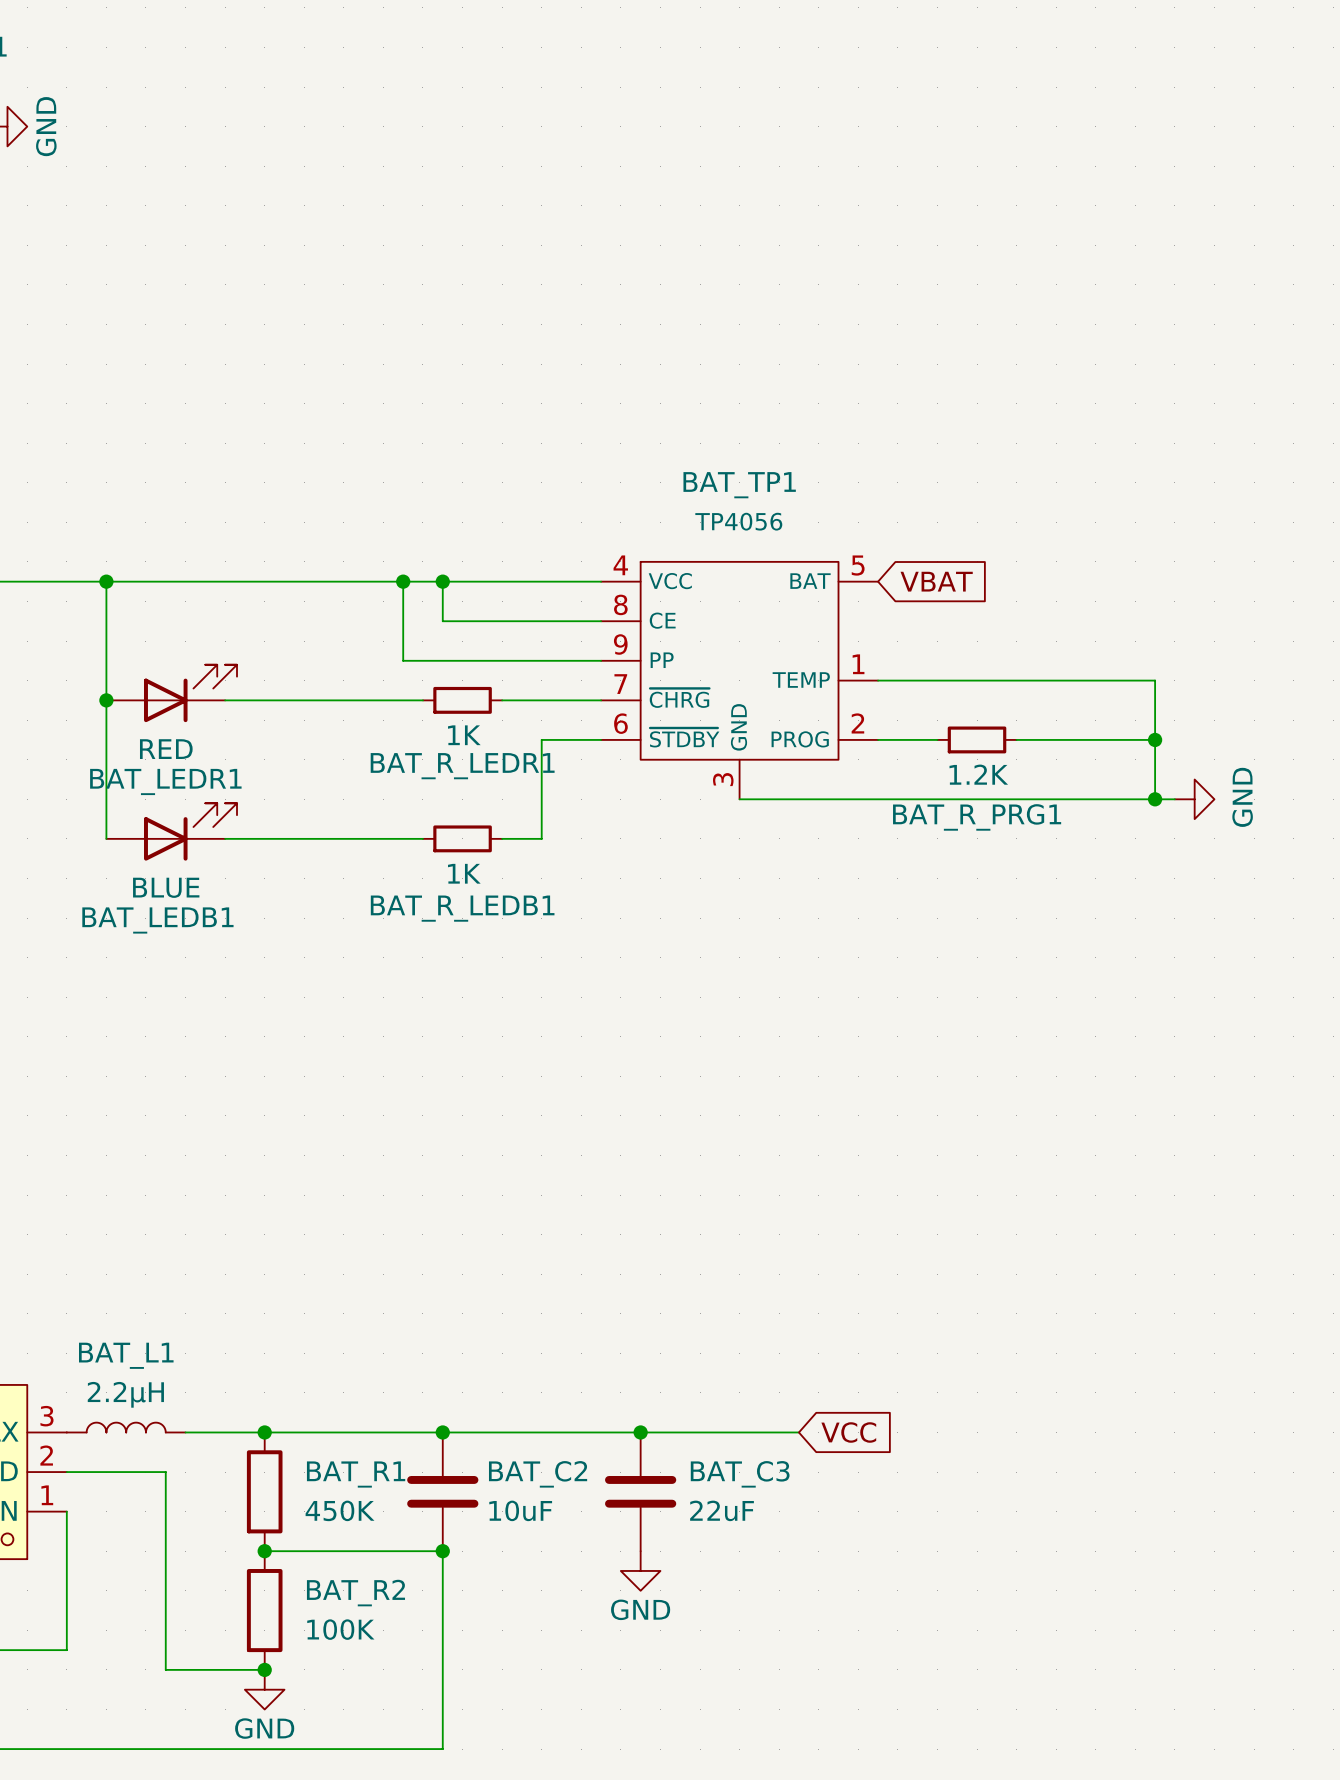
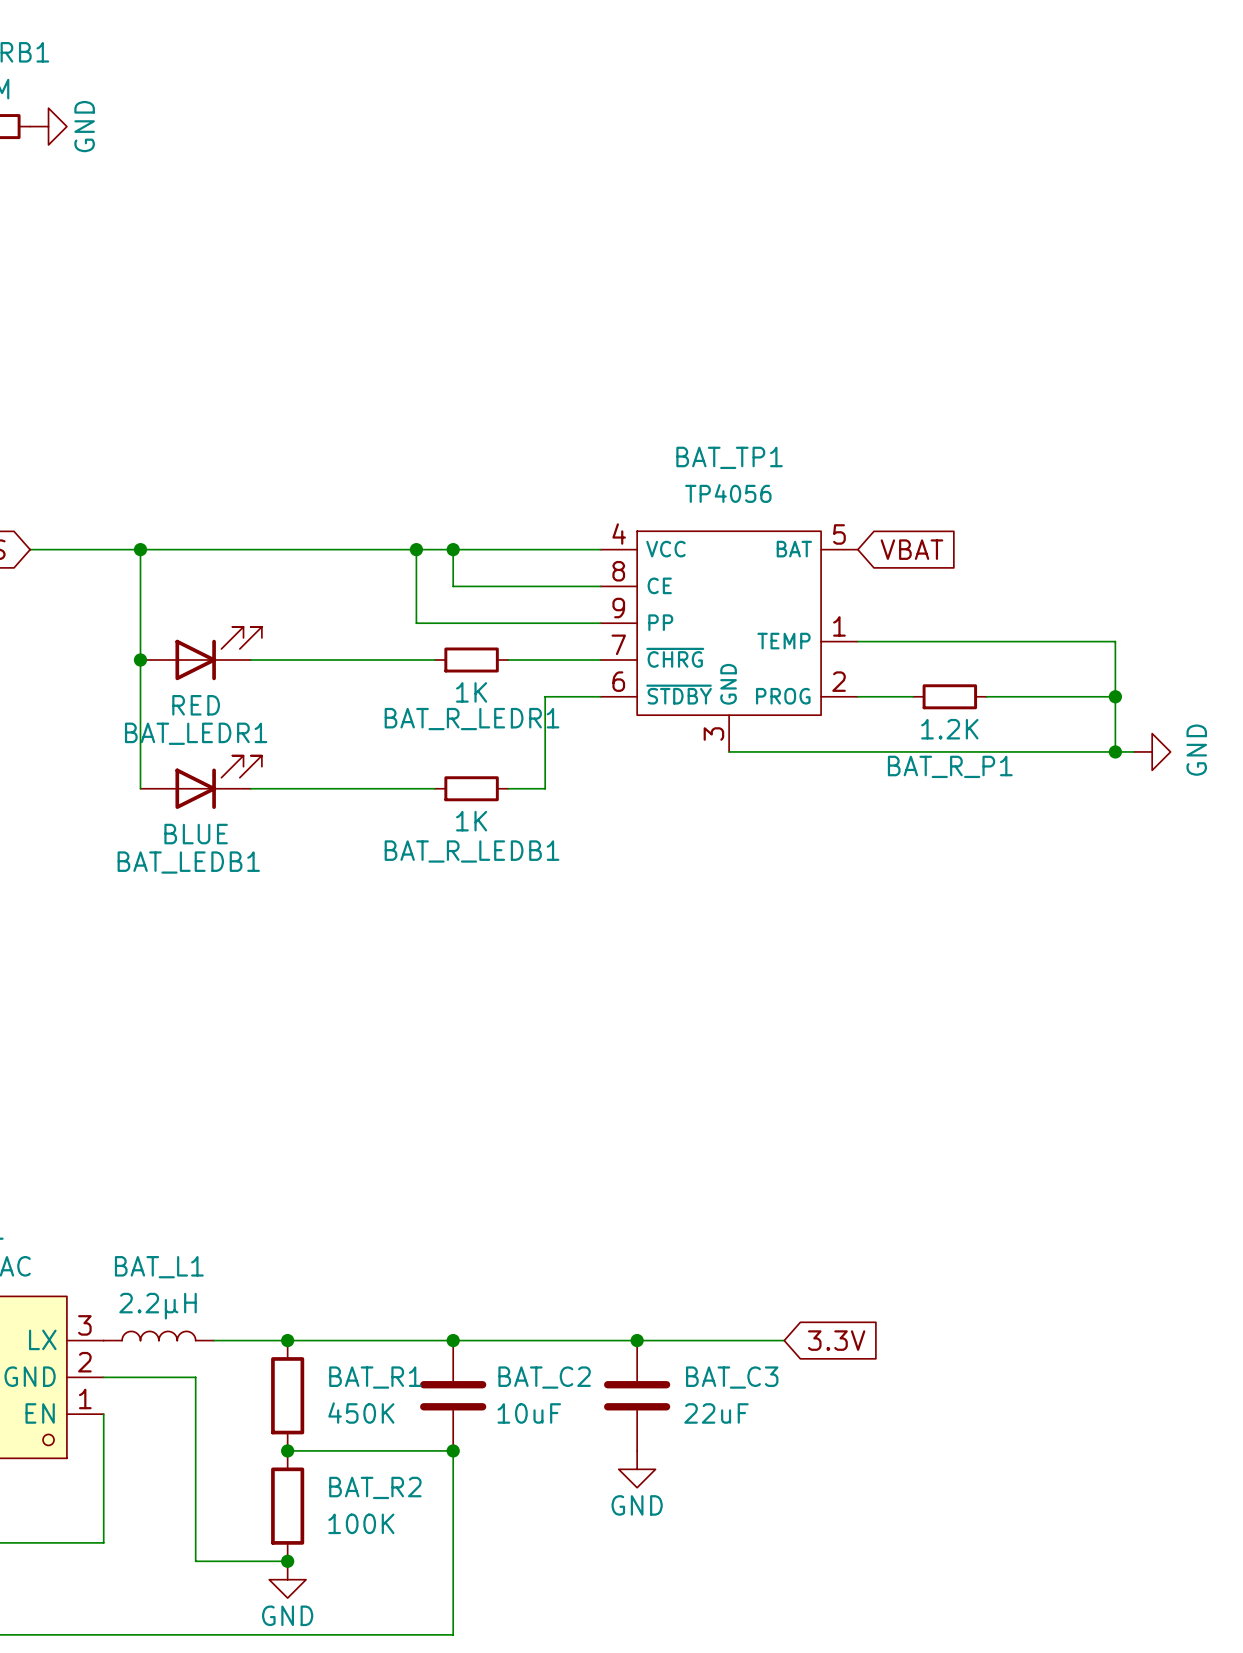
BAT_R_PRG1 name: BAT_R_PRG1 (977, 817) -> BAT_R_P1 (950, 766)
global label: VCC (848, 1432) -> 3.3V (836, 1340)

